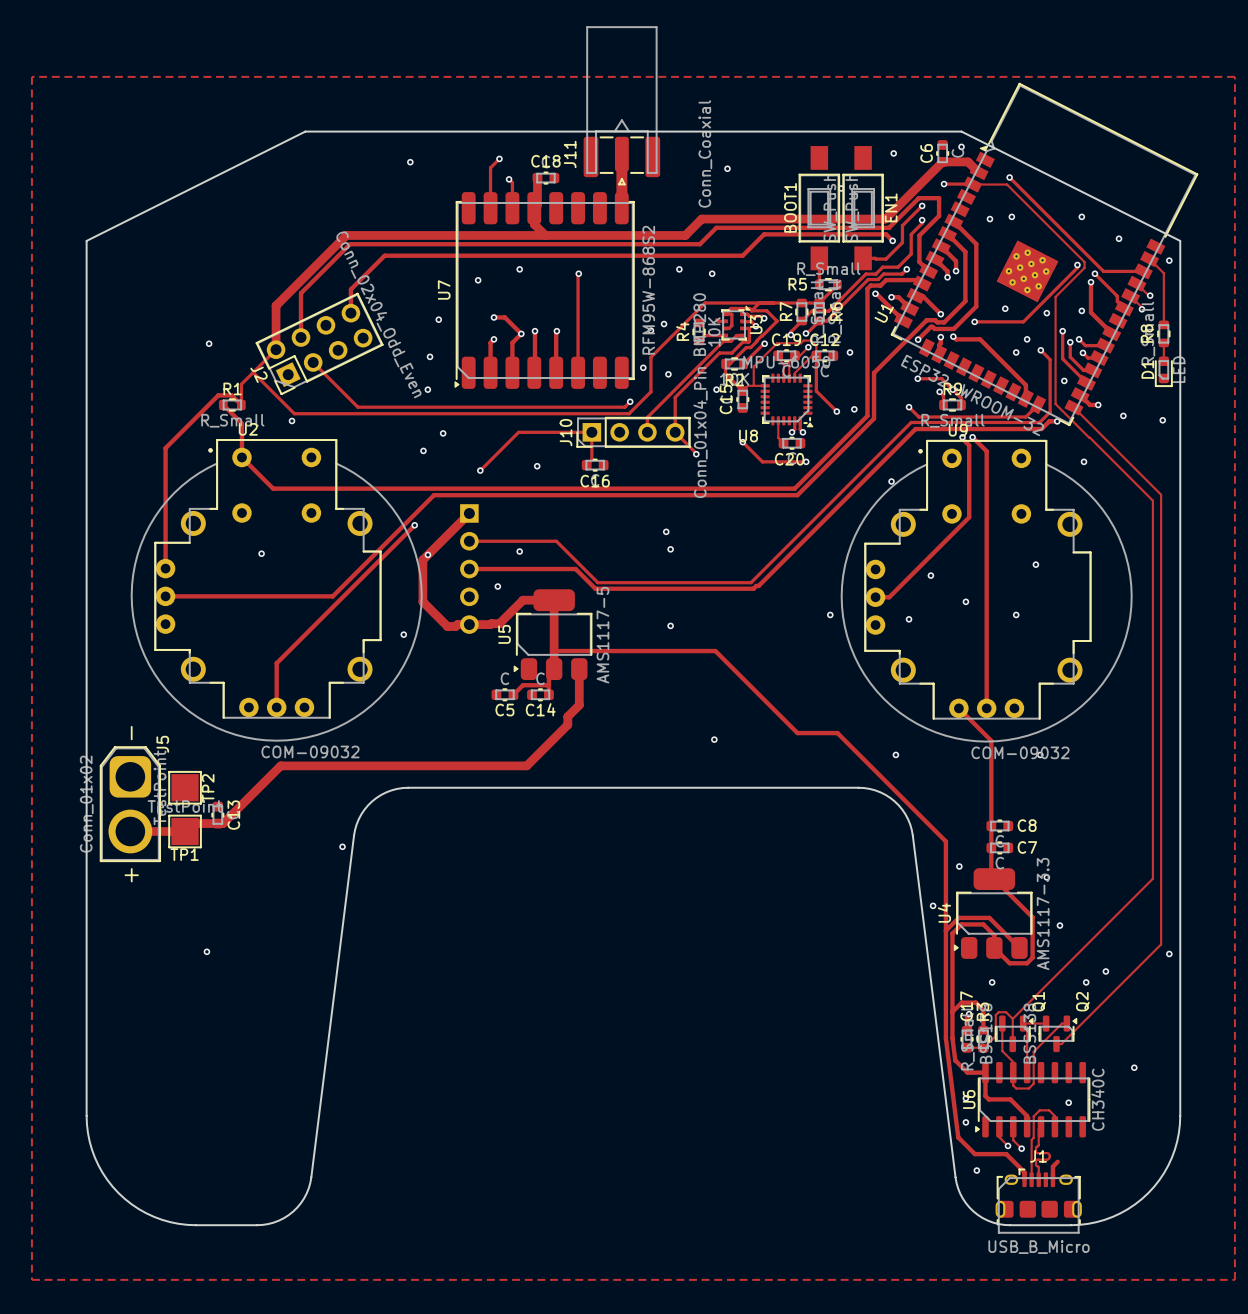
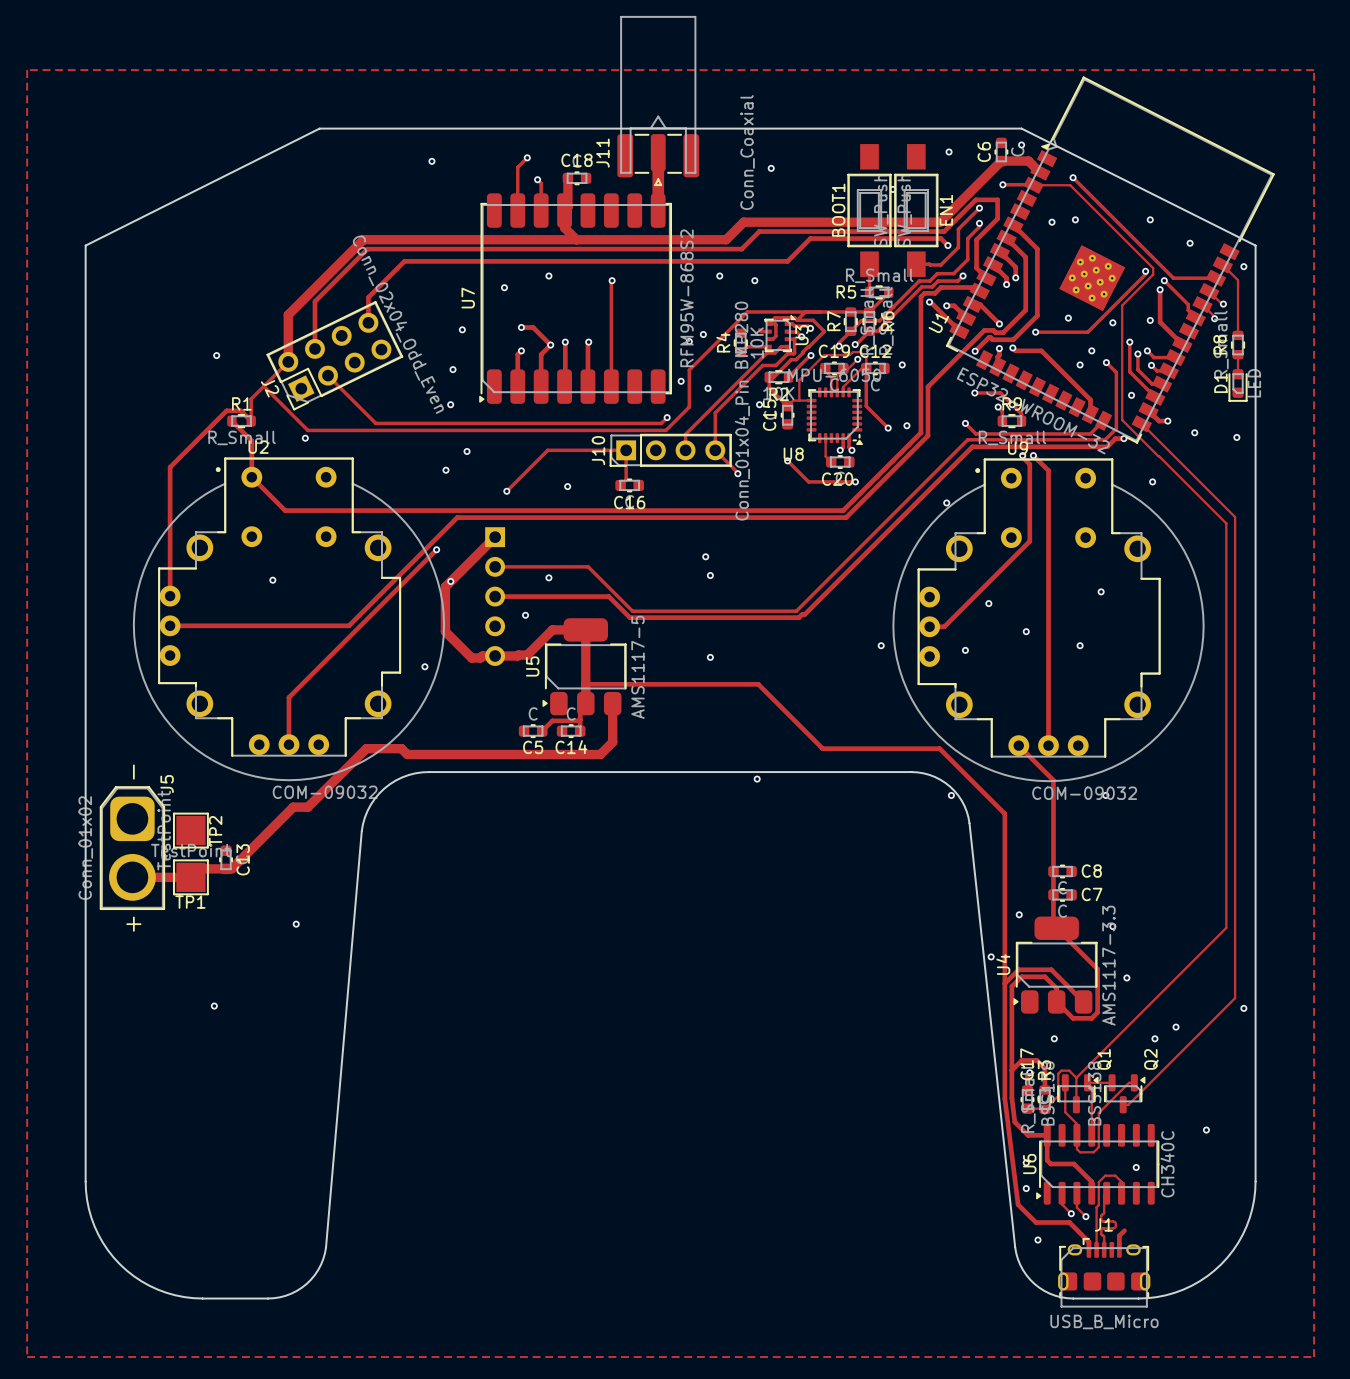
track: (775, 711) (797, 733) (837, 733) (945, 841) -> (822, 748) (939, 748) (1004, 813) (1004, 888)
track: (567, 716) (567, 724) (526, 765) (294, 765) -> (600, 754) (407, 754) (401, 748) (366, 748) (307, 807)
via position: (342, 846) -> (296, 924)
board edge: (311, 1177) (355, 830) (361, 814) (372, 801) (386, 792) (408, 787) (858, 787) (875, 790) (890, 797) (905, 814) (912, 835) (955, 1177) -> (326, 1247) (363, 824) (370, 804) (384, 788) (402, 777) (429, 772) (911, 772) (929, 774) (950, 786) (964, 805) (969, 823) (1015, 1247)

